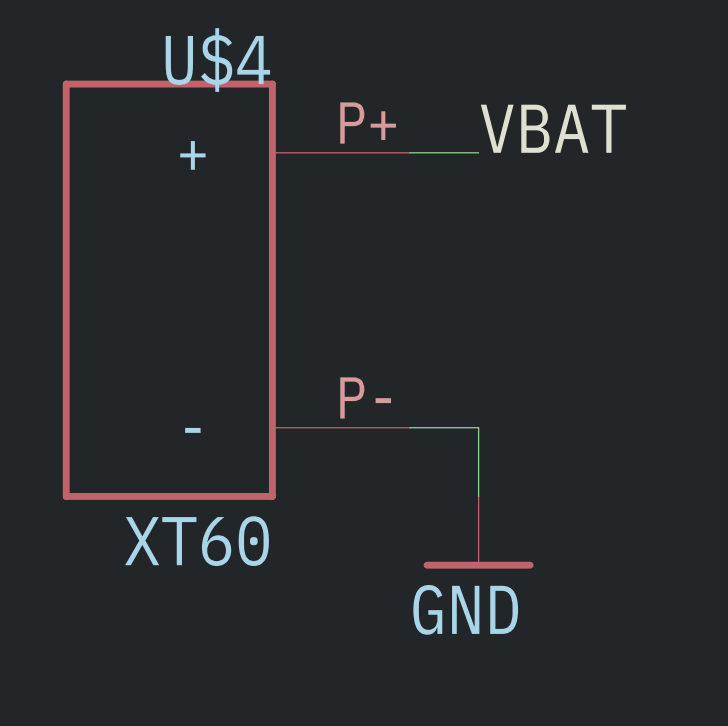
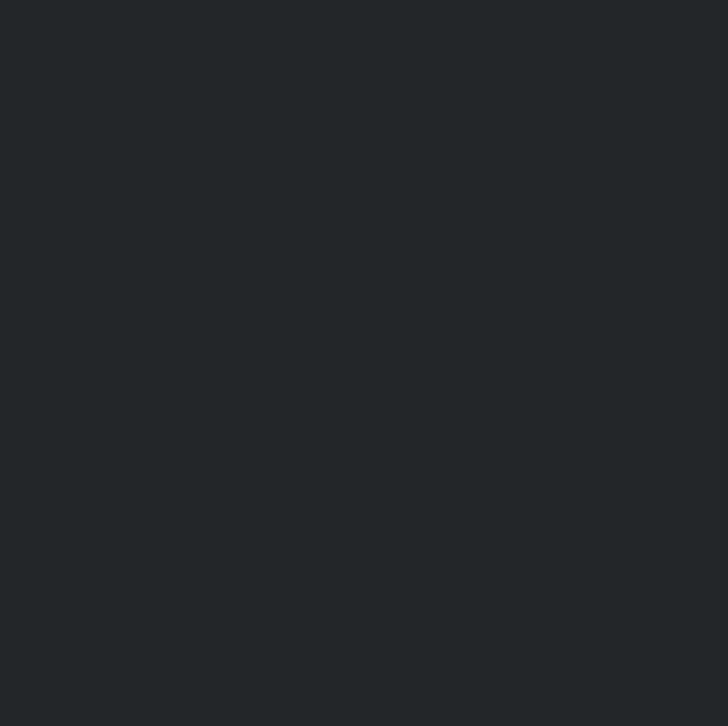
label: VBAT (553, 128) -> none
wire: (409, 152) (478, 152) -> none
U$4: XT60 (236, 290) -> none
wire: (409, 427) (478, 427) (478, 496) -> none
power symbol: GND (478, 532) -> none

